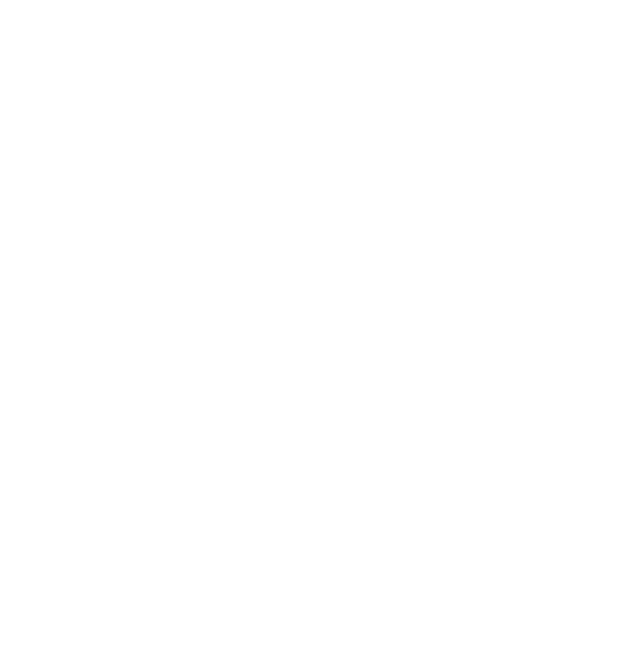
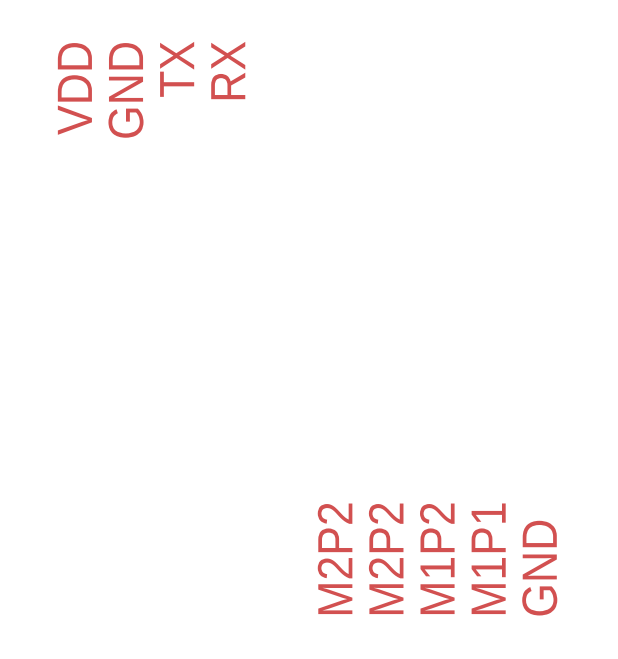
text: none -> TX (177, 69)
text: none -> RX (228, 70)
text: none -> VDD (74, 88)
text: none -> GND (126, 90)
text: none -> M2P2 (335, 558)
text: none -> M2P2 (386, 558)
text: none -> M1P2 (437, 558)
text: none -> M1P1 (488, 558)
text: none -> GND (539, 568)

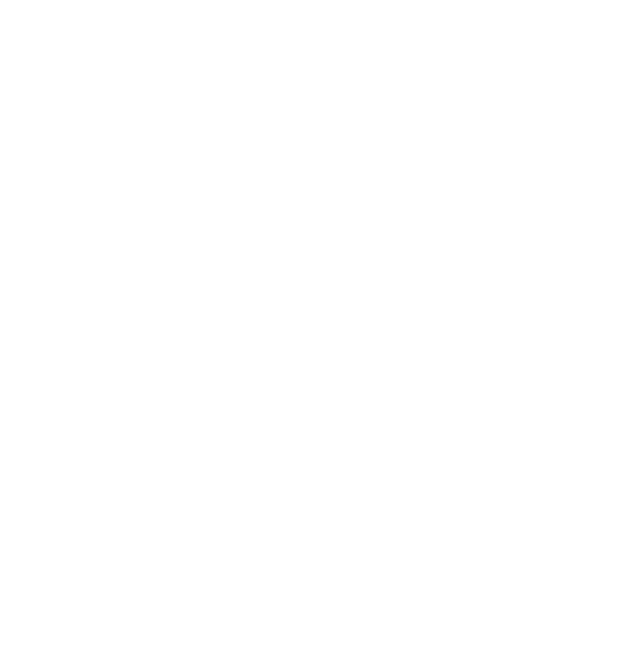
text: TX (177, 69) -> none
text: RX (228, 70) -> none
text: VDD (74, 88) -> none
text: GND (126, 90) -> none
text: M2P2 (335, 558) -> none
text: M2P2 (386, 558) -> none
text: M1P2 (437, 558) -> none
text: M1P1 (488, 558) -> none
text: GND (539, 568) -> none

